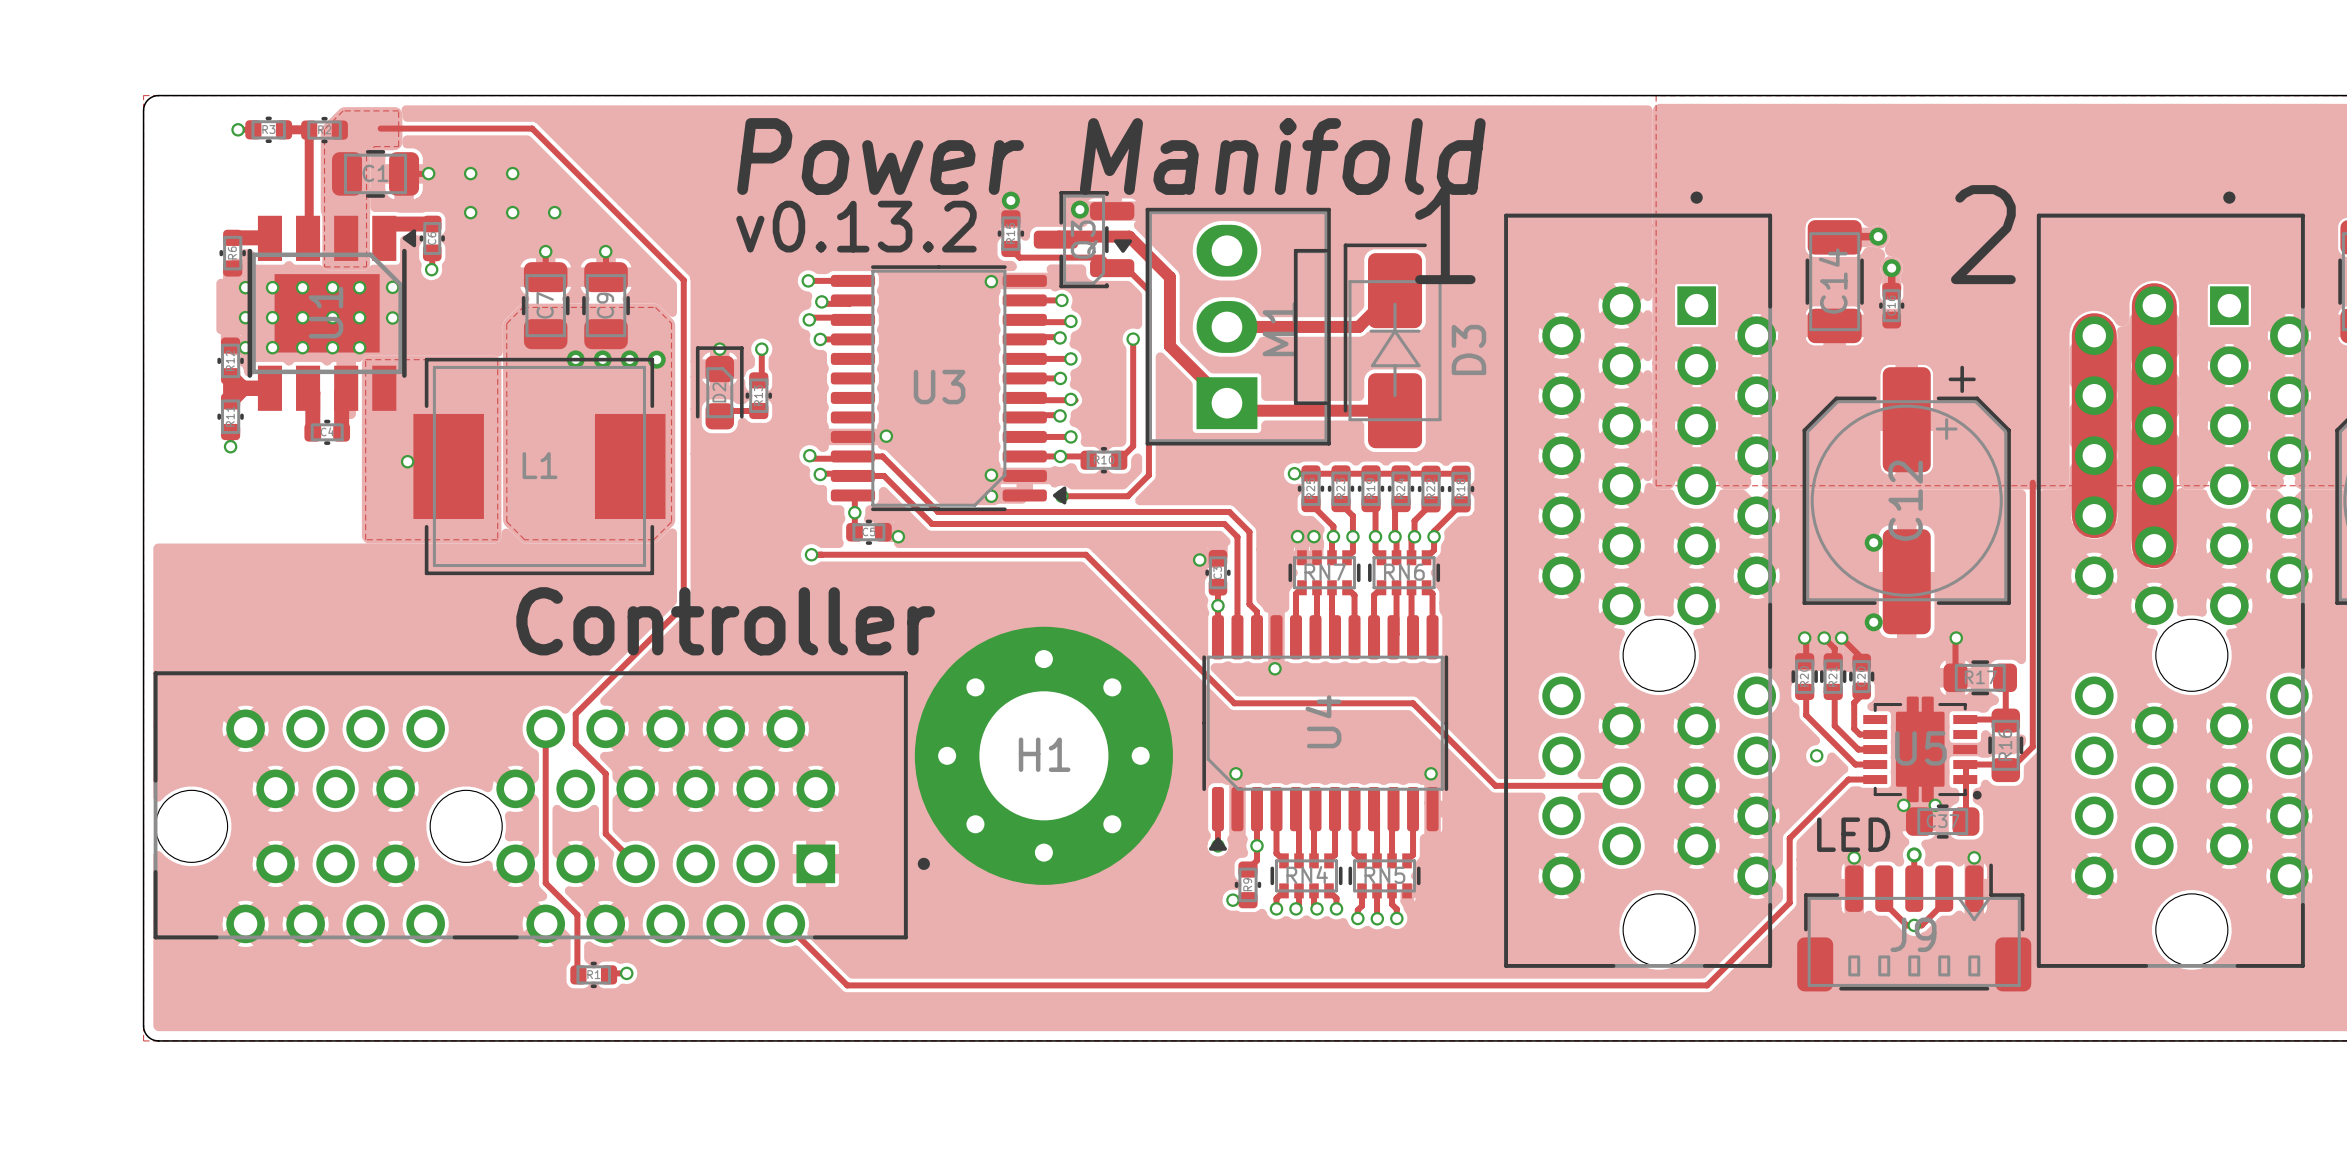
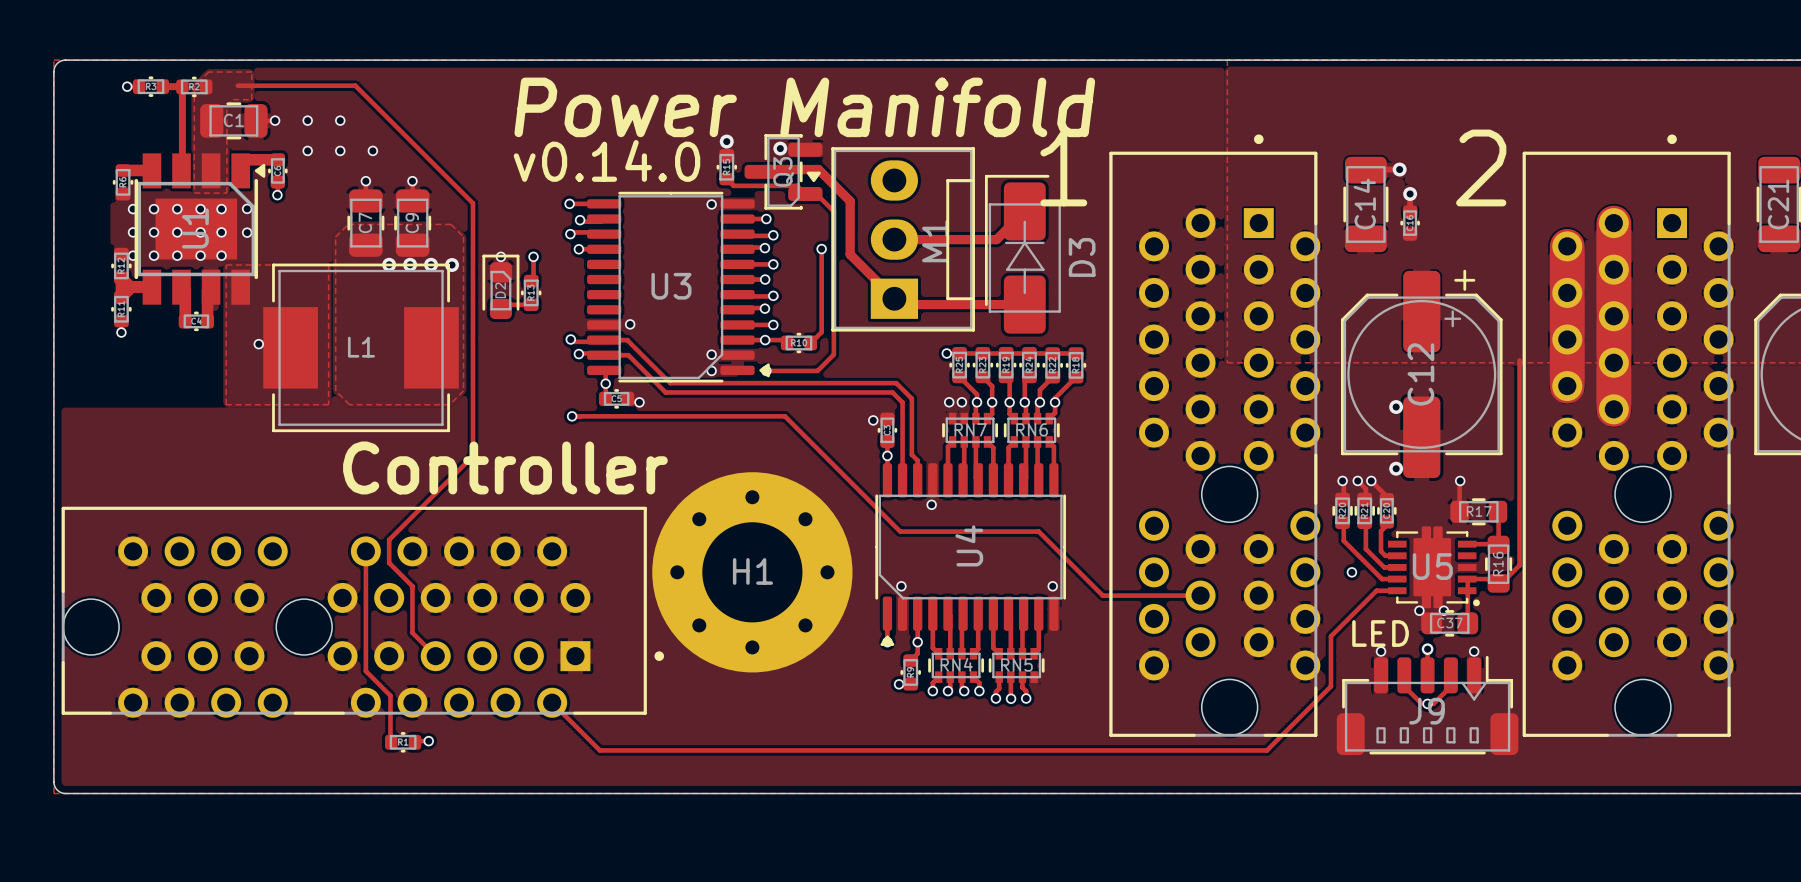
text: v0.13.2 (856, 226) -> v0.14.0 (606, 160)

